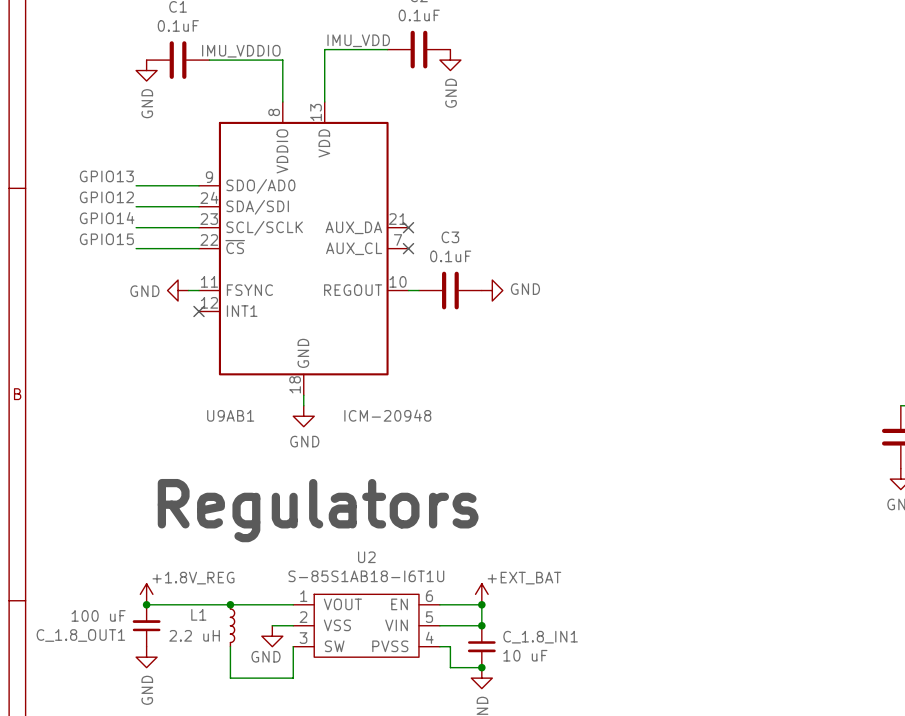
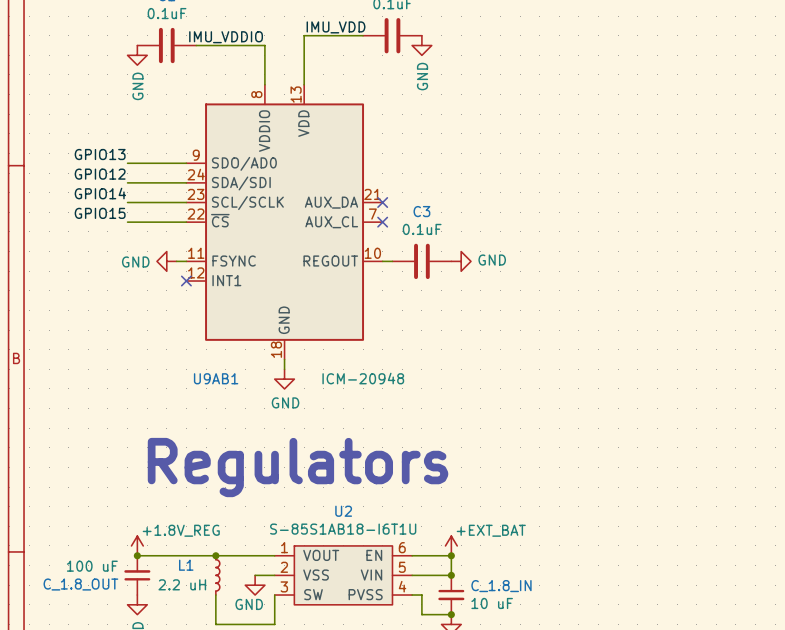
C_1.8_OUT1 name: C_1.8_OUT1 (80, 635) -> C_1.8_OUT (80, 584)
C_1.8_IN1 name: C_1.8_IN1 (540, 637) -> C_1.8_IN (501, 586)

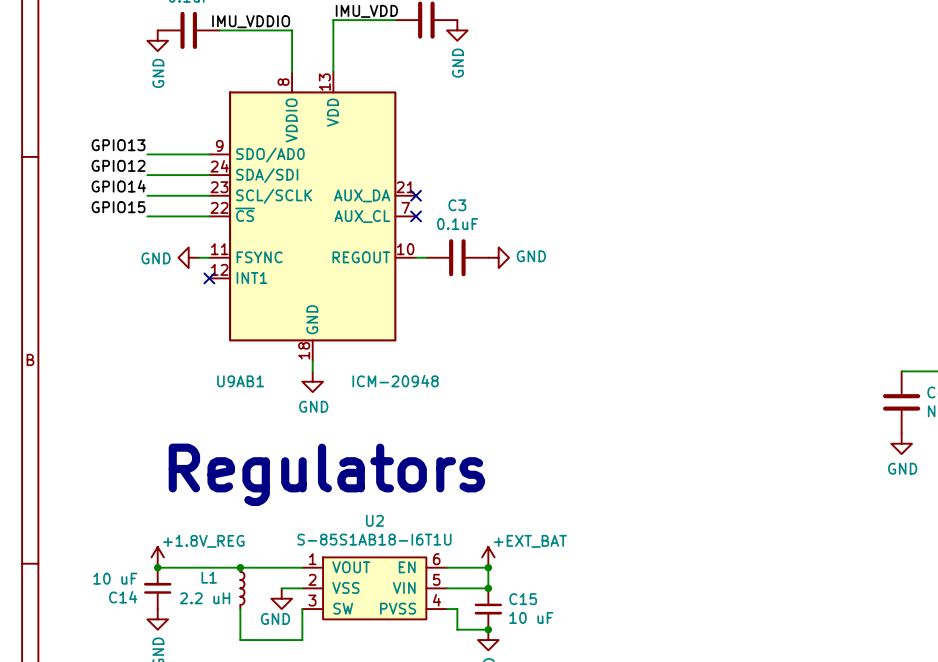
C_1.8_OUT value: 100 uF (92, 566) -> 10 uF (115, 578)
C_1.8_OUT name: C_1.8_OUT (80, 584) -> C14 (123, 597)
C_1.8_IN name: C_1.8_IN (501, 586) -> C15 (523, 599)

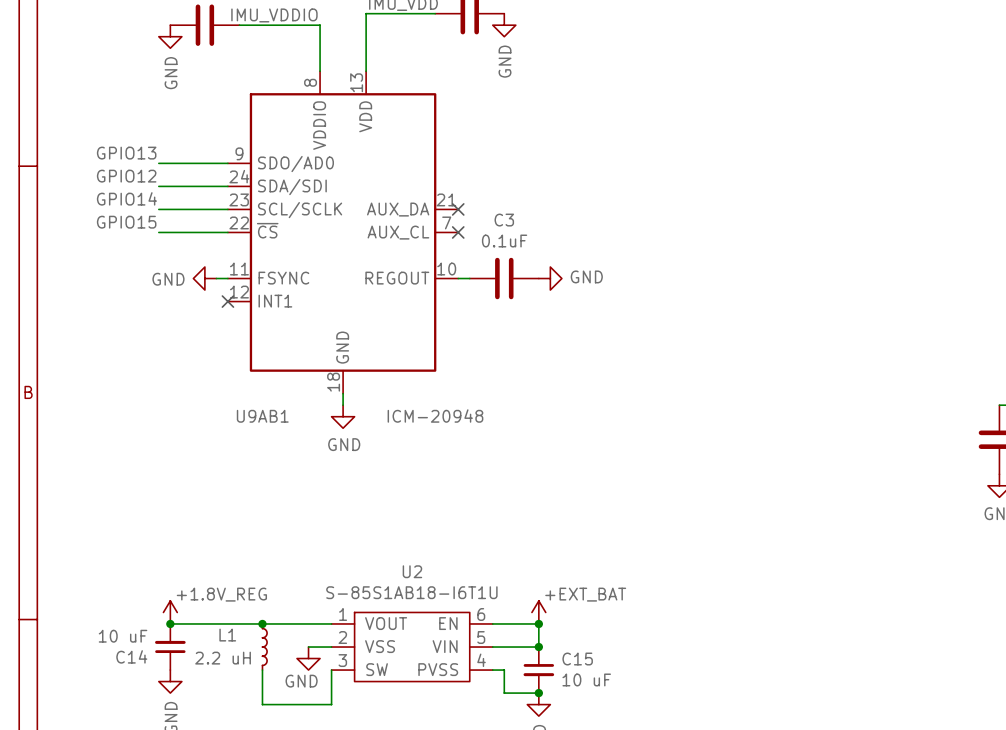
text: Regulators (326, 474) -> none

